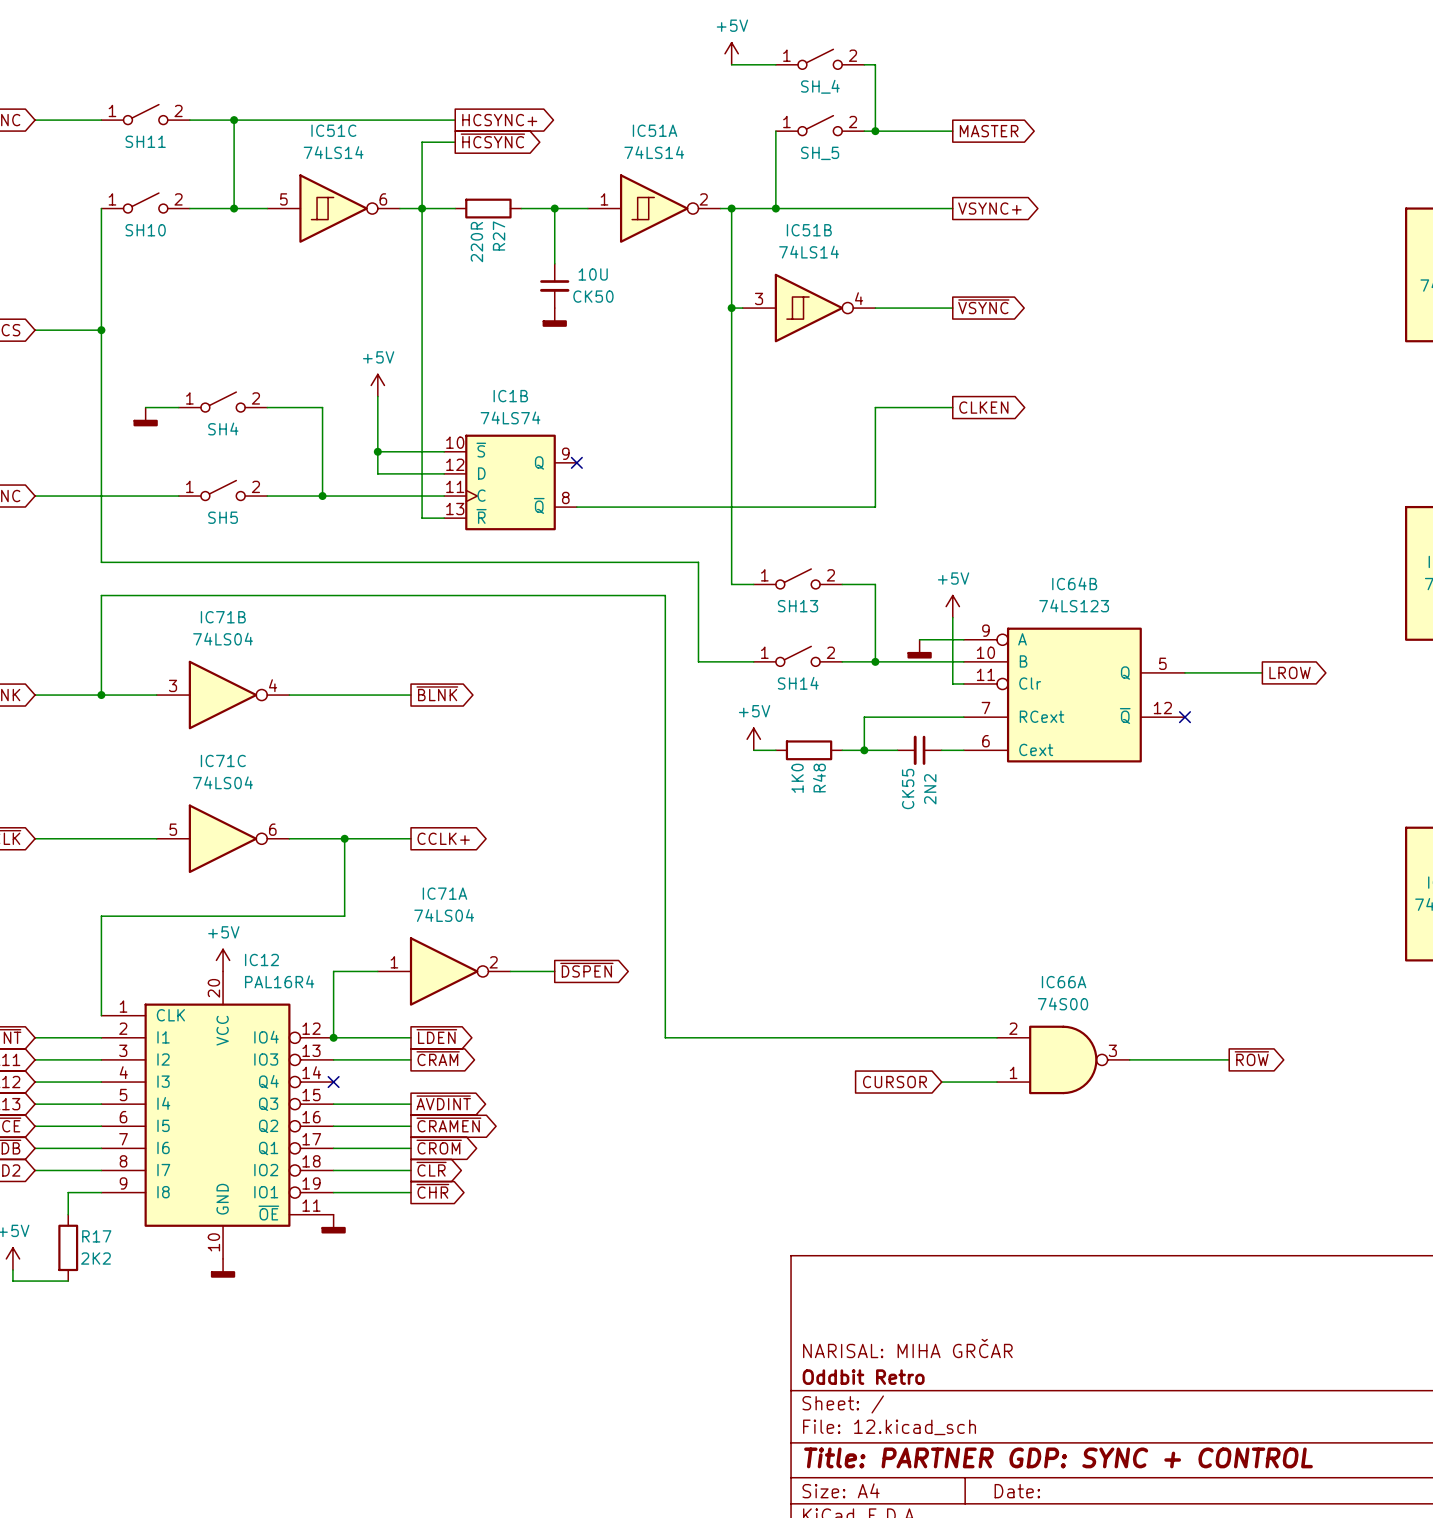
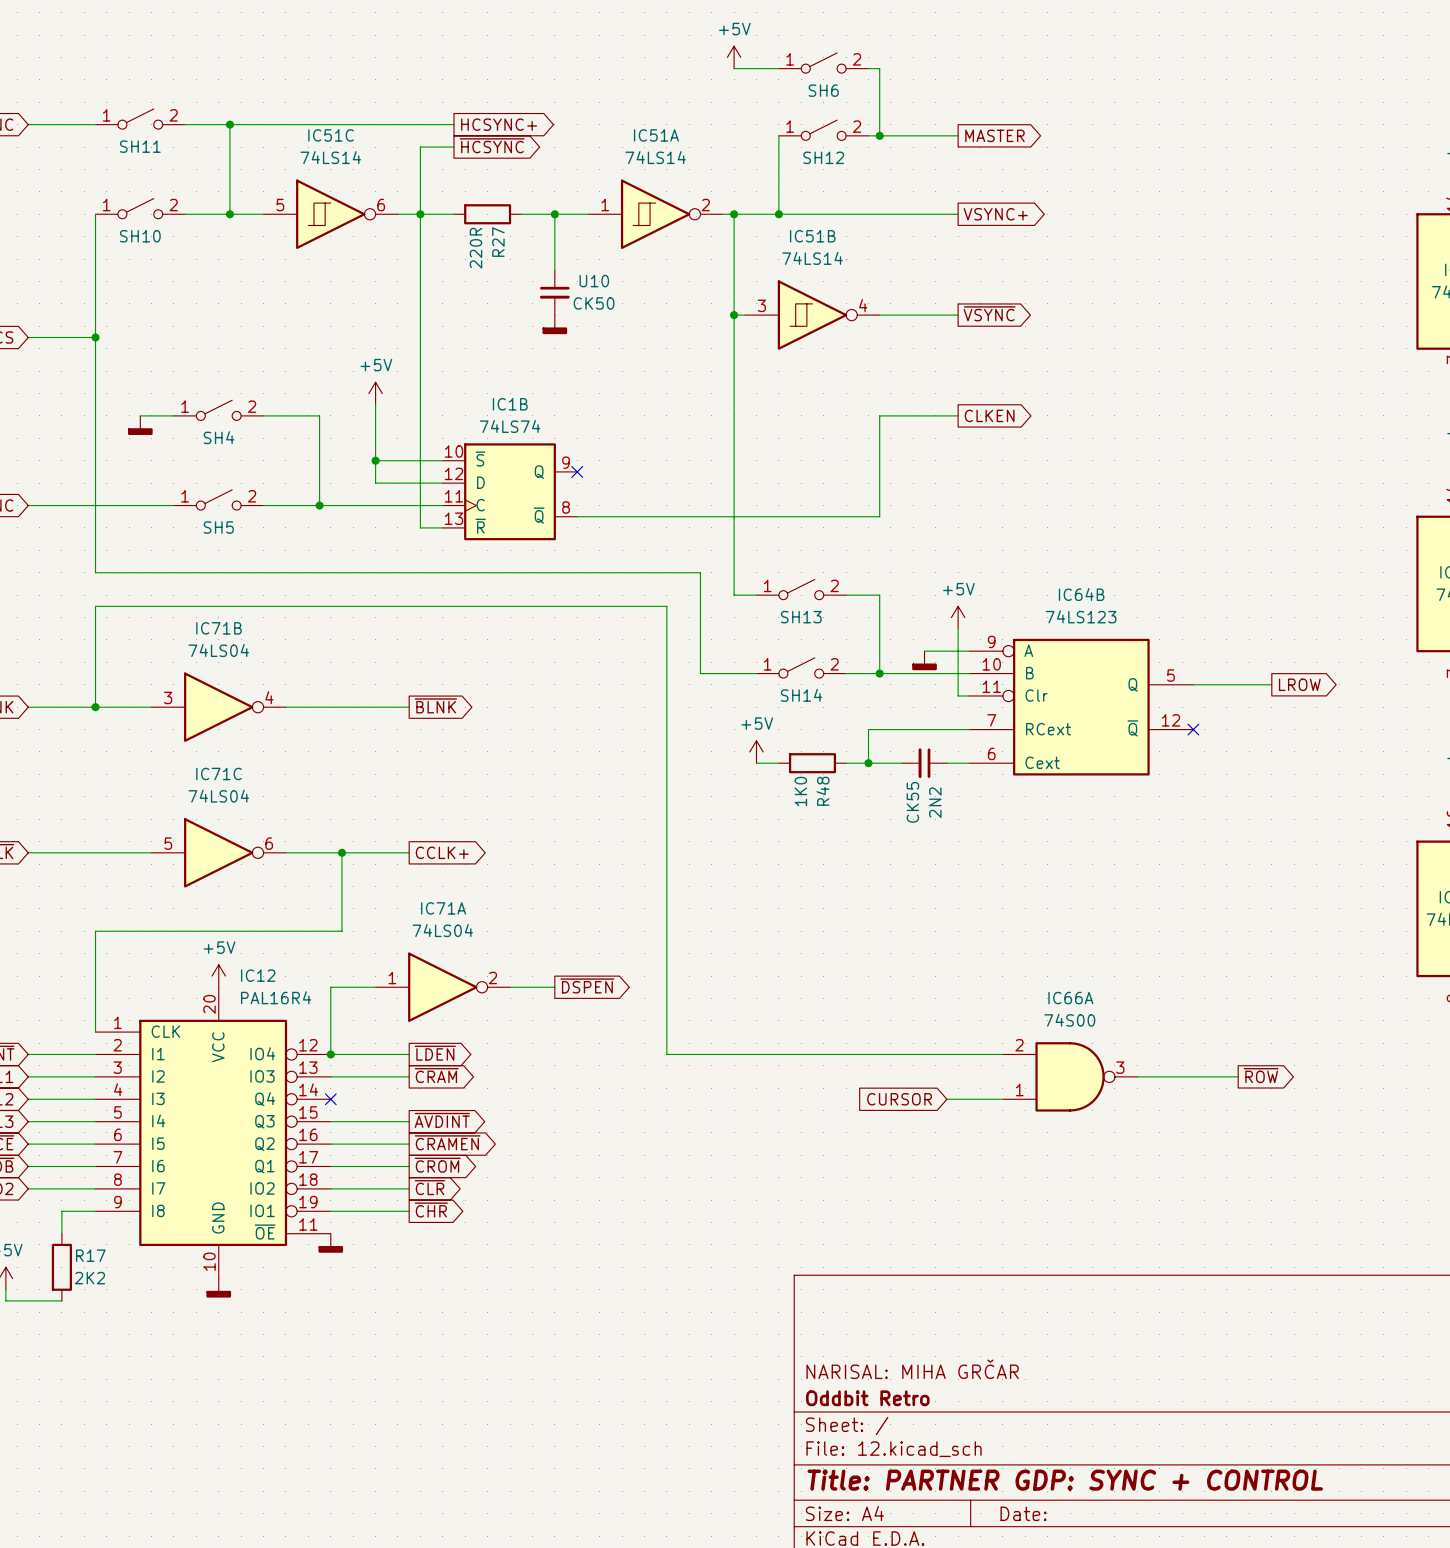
SH_4 name: SH_4 (820, 86) -> SH6 (823, 90)
SH_5 name: SH_5 (820, 153) -> SH12 (823, 157)
CK50 value: 10U (593, 274) -> U10 (594, 281)

